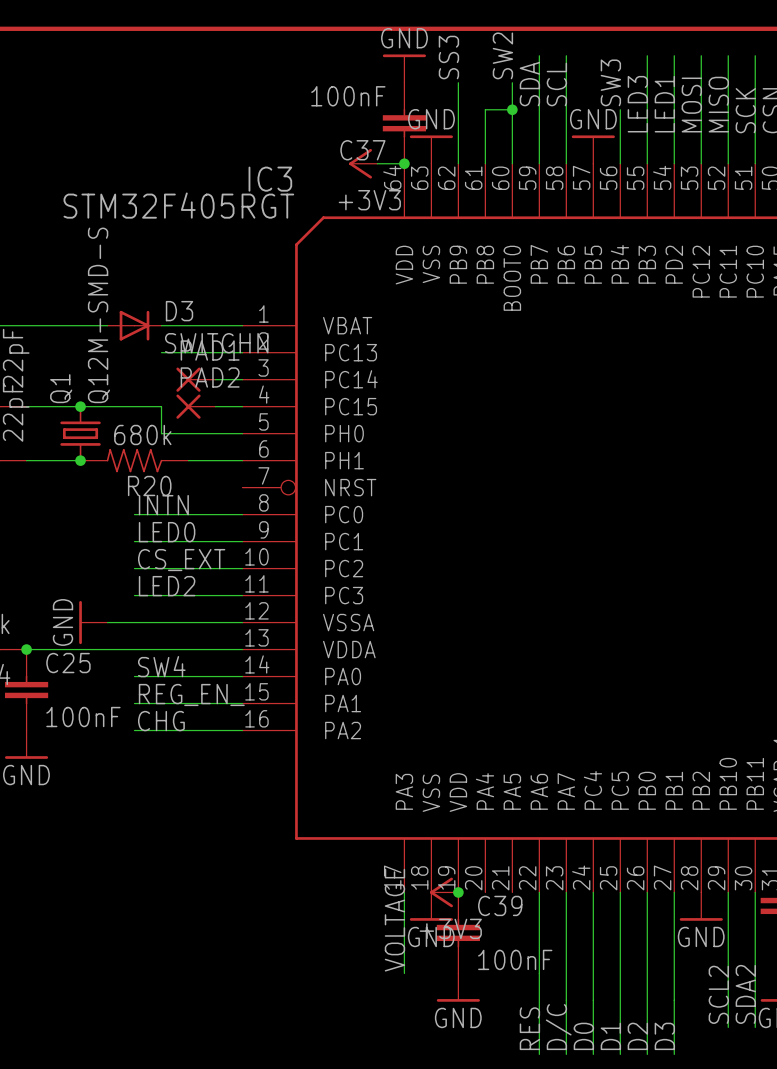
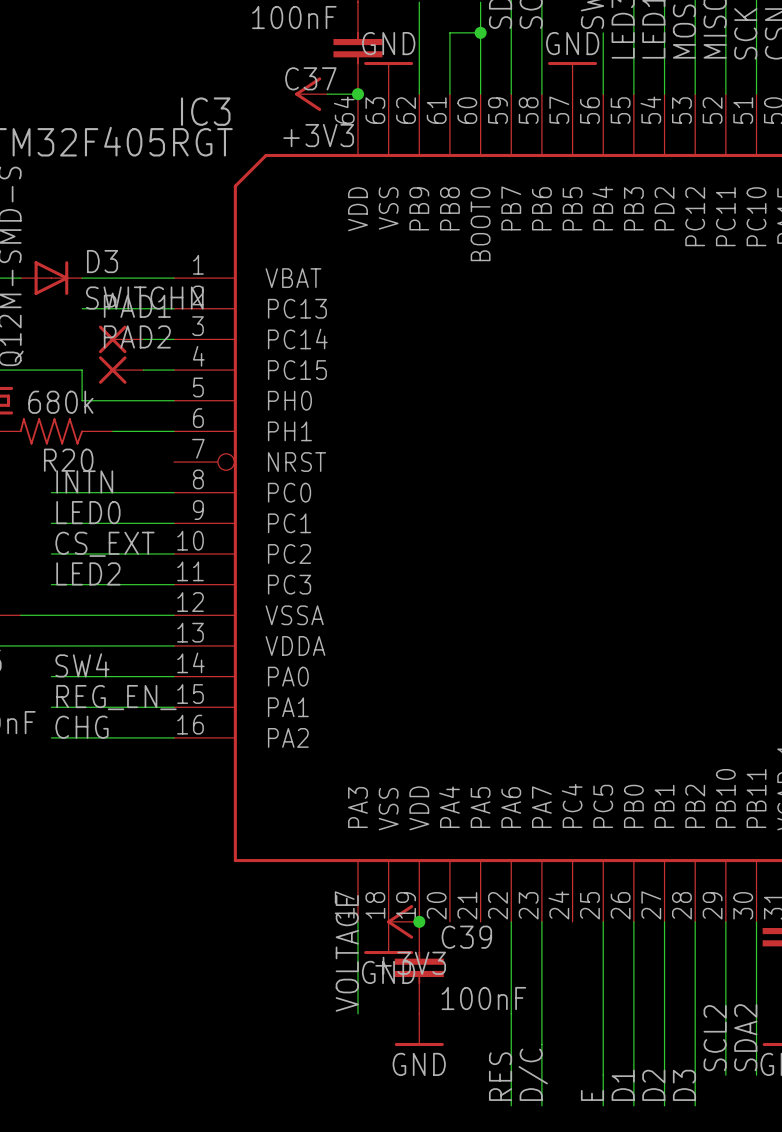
wire: (593, 892) (593, 1054) -> (695, 921) (695, 1105)
power symbol: GND (701, 906) -> none
label: D0 (583, 1036) -> none
label: D1 (610, 1036) -> E (592, 1095)
label: D2 (637, 1036) -> D1 (623, 1085)
label: D3 (664, 1036) -> D2 (653, 1085)
label: none -> D3 (684, 1085)

